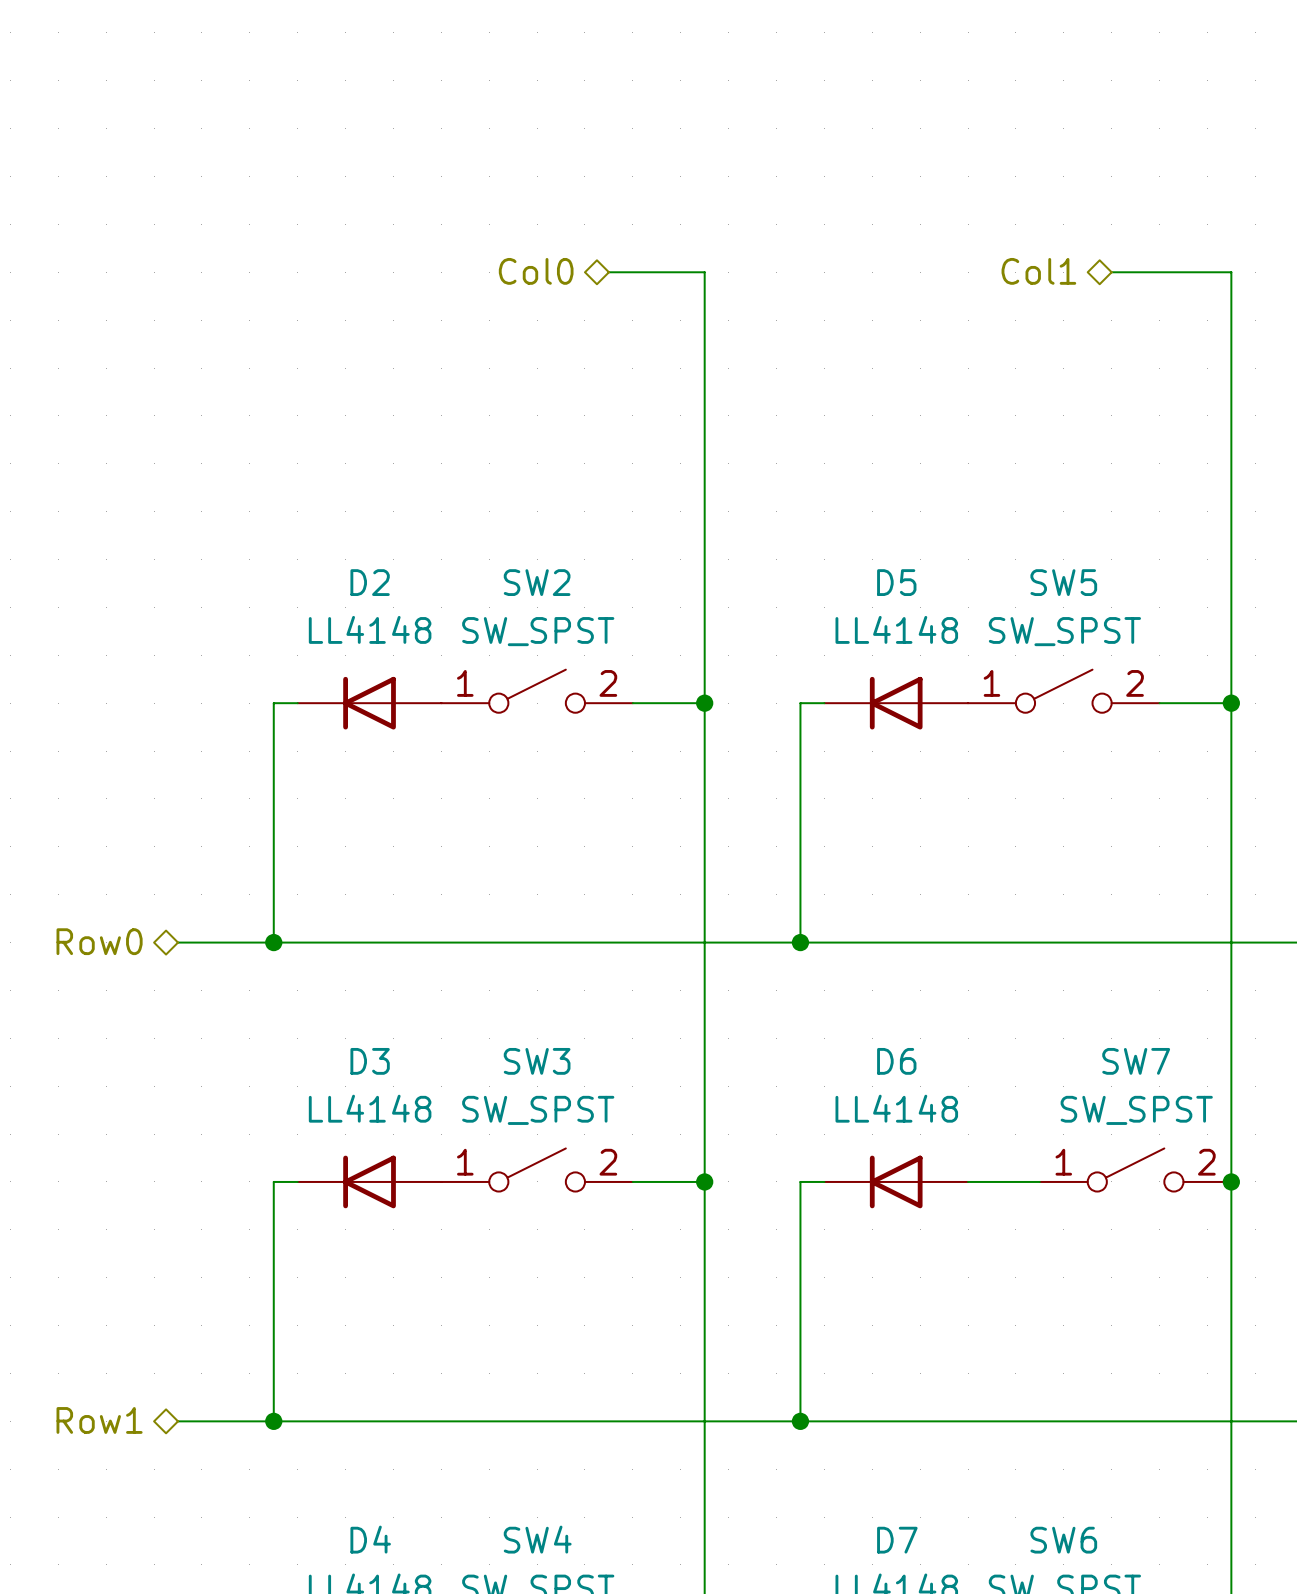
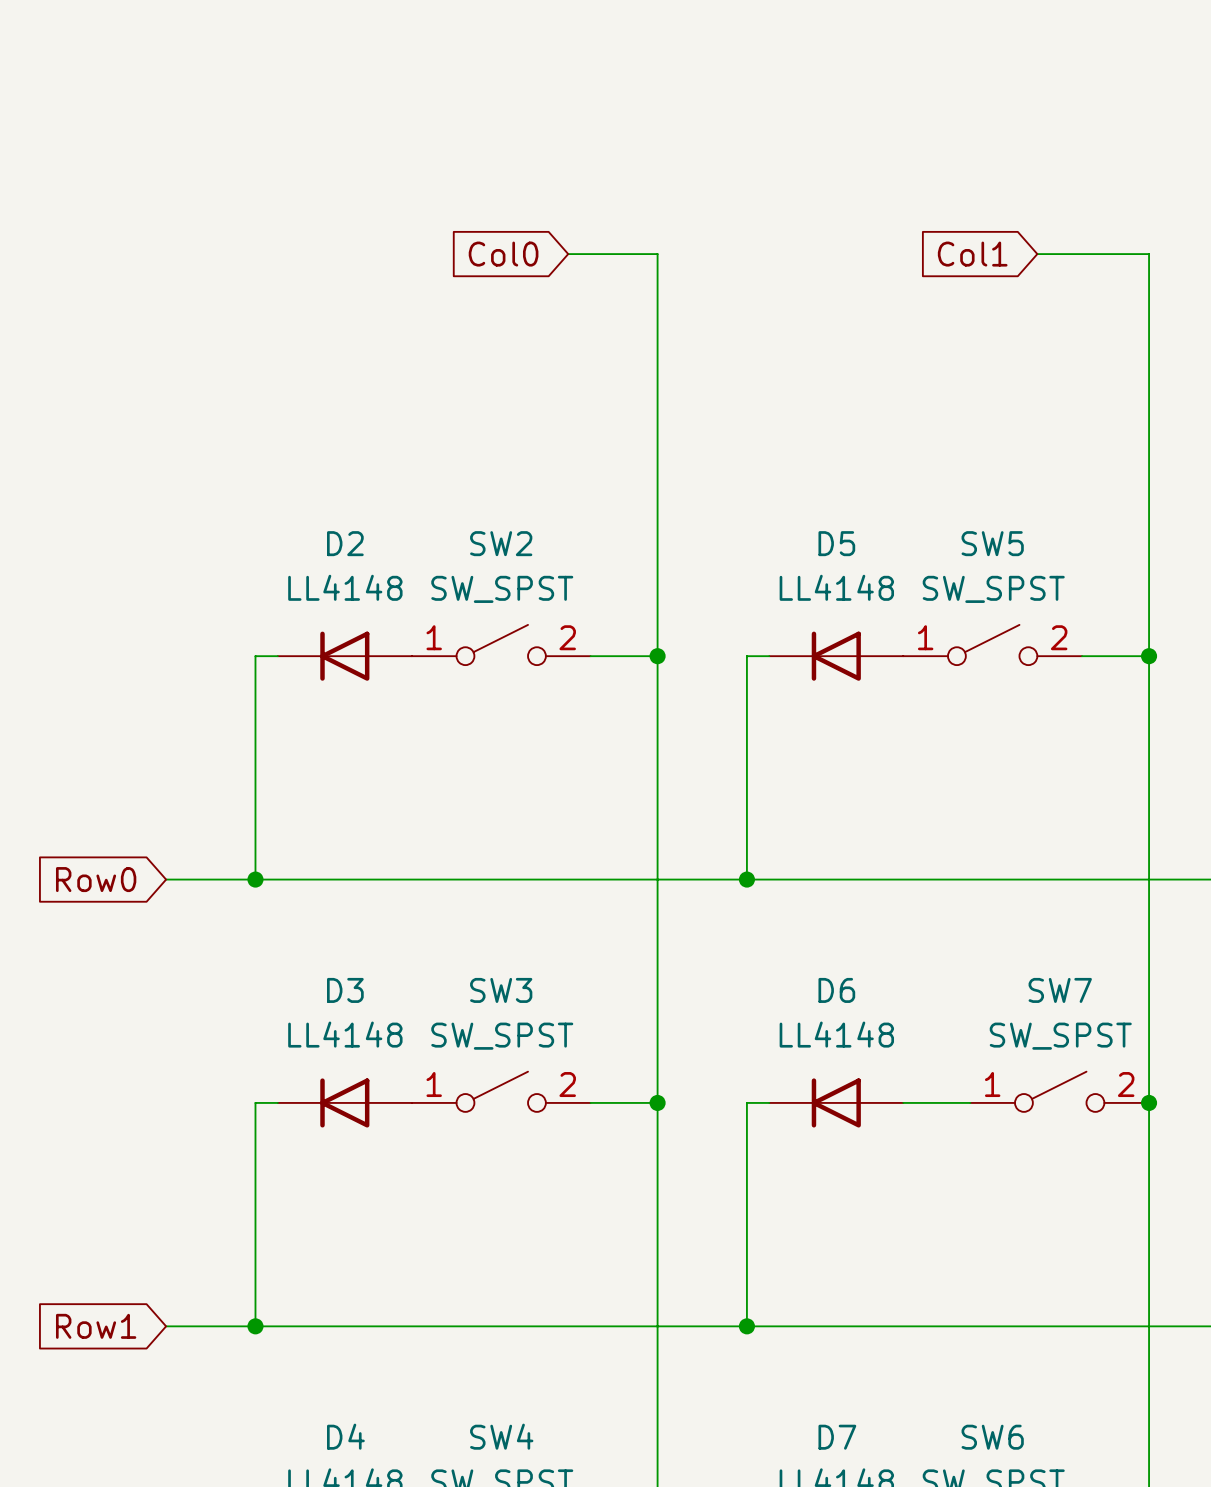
hierarchical label: Col0 (536, 271) -> none
hierarchical label: Col1 (1038, 271) -> none
global label: none -> Col0 (503, 254)
global label: none -> Col1 (972, 254)
hierarchical label: Row0 (99, 941) -> none
global label: none -> Row0 (96, 879)
hierarchical label: Row1 (99, 1420) -> none
global label: none -> Row1 (96, 1326)

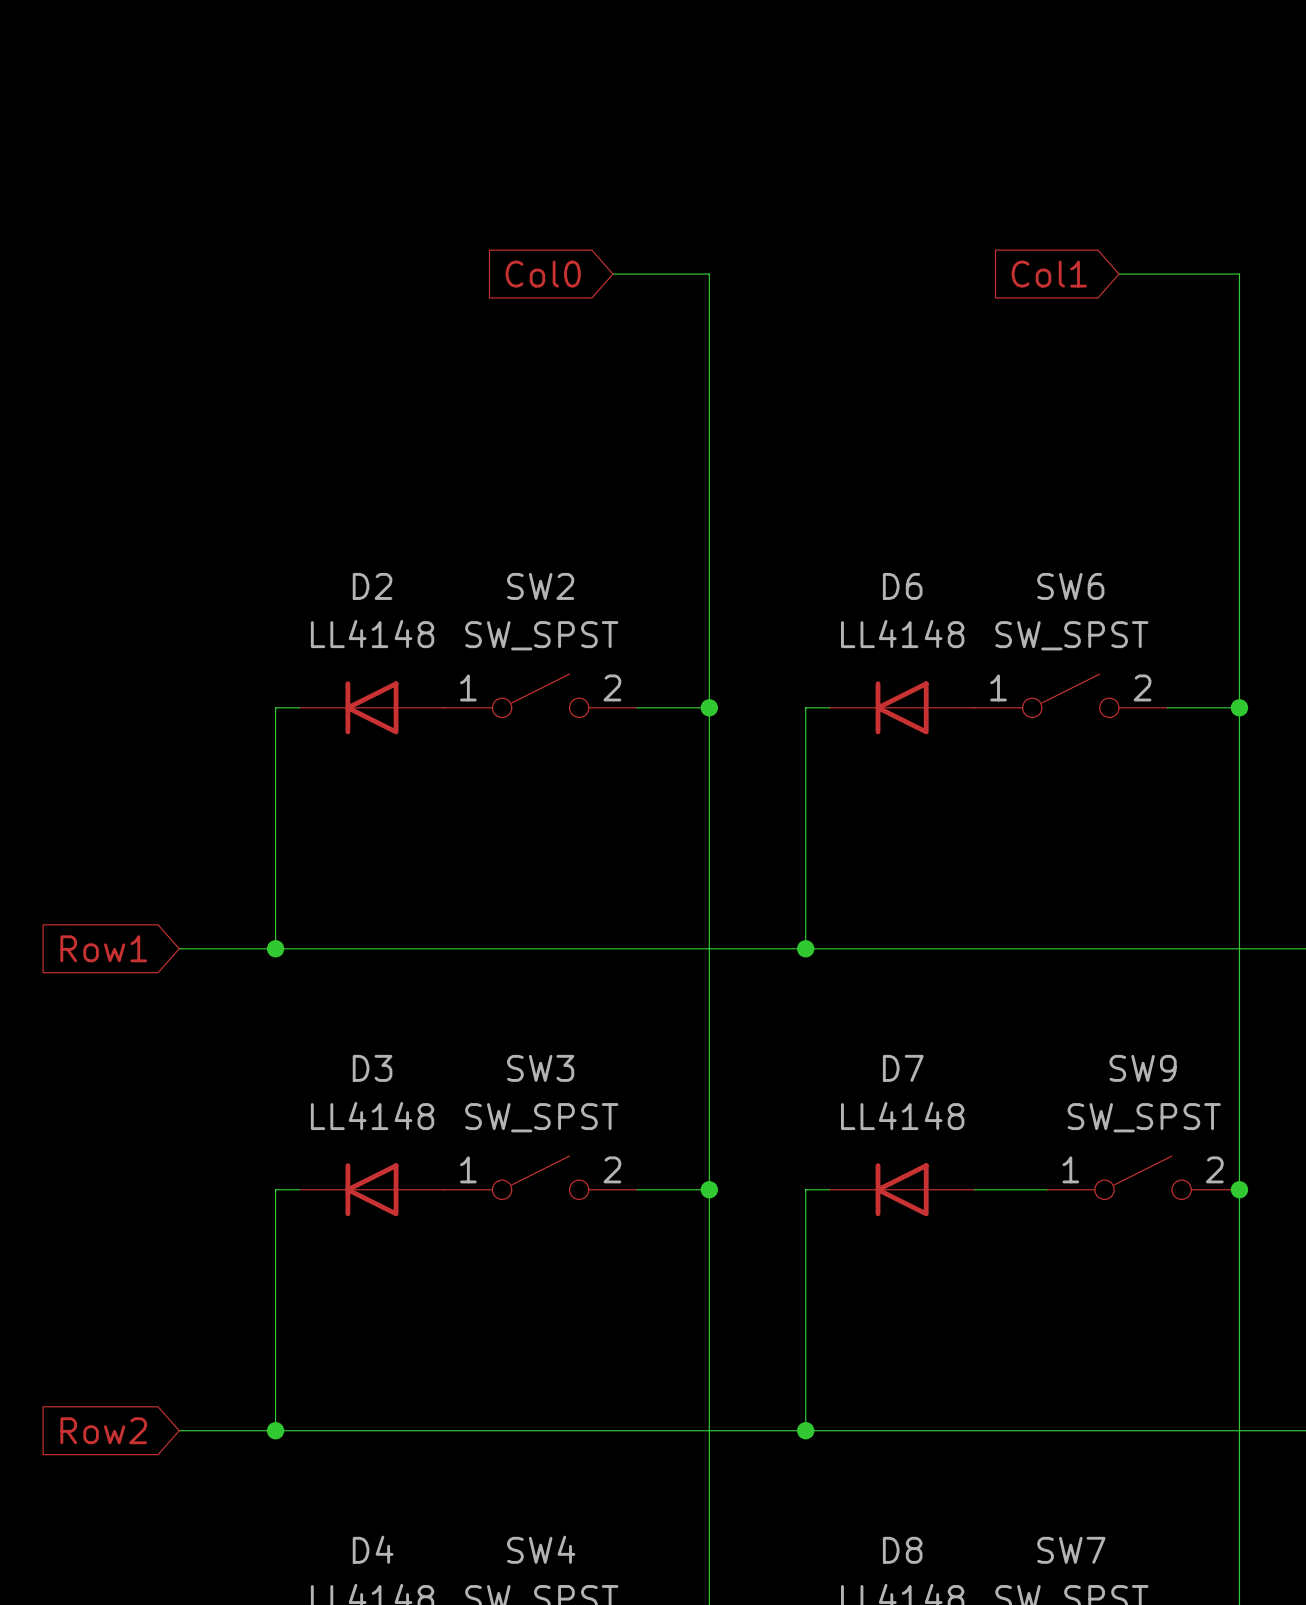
D5 name: D5 (836, 543) -> D6 (902, 586)
SW5 name: SW5 (992, 543) -> SW6 (1070, 586)
global label: Row0 (96, 879) -> Row1 (103, 948)
D6 name: D6 (836, 990) -> D7 (903, 1068)
SW7 name: SW7 (1060, 990) -> SW9 (1143, 1068)
global label: Row1 (96, 1326) -> Row2 (103, 1430)
D7 name: D7 (837, 1437) -> D8 (902, 1550)
SW6 name: SW6 (992, 1437) -> SW7 (1071, 1550)

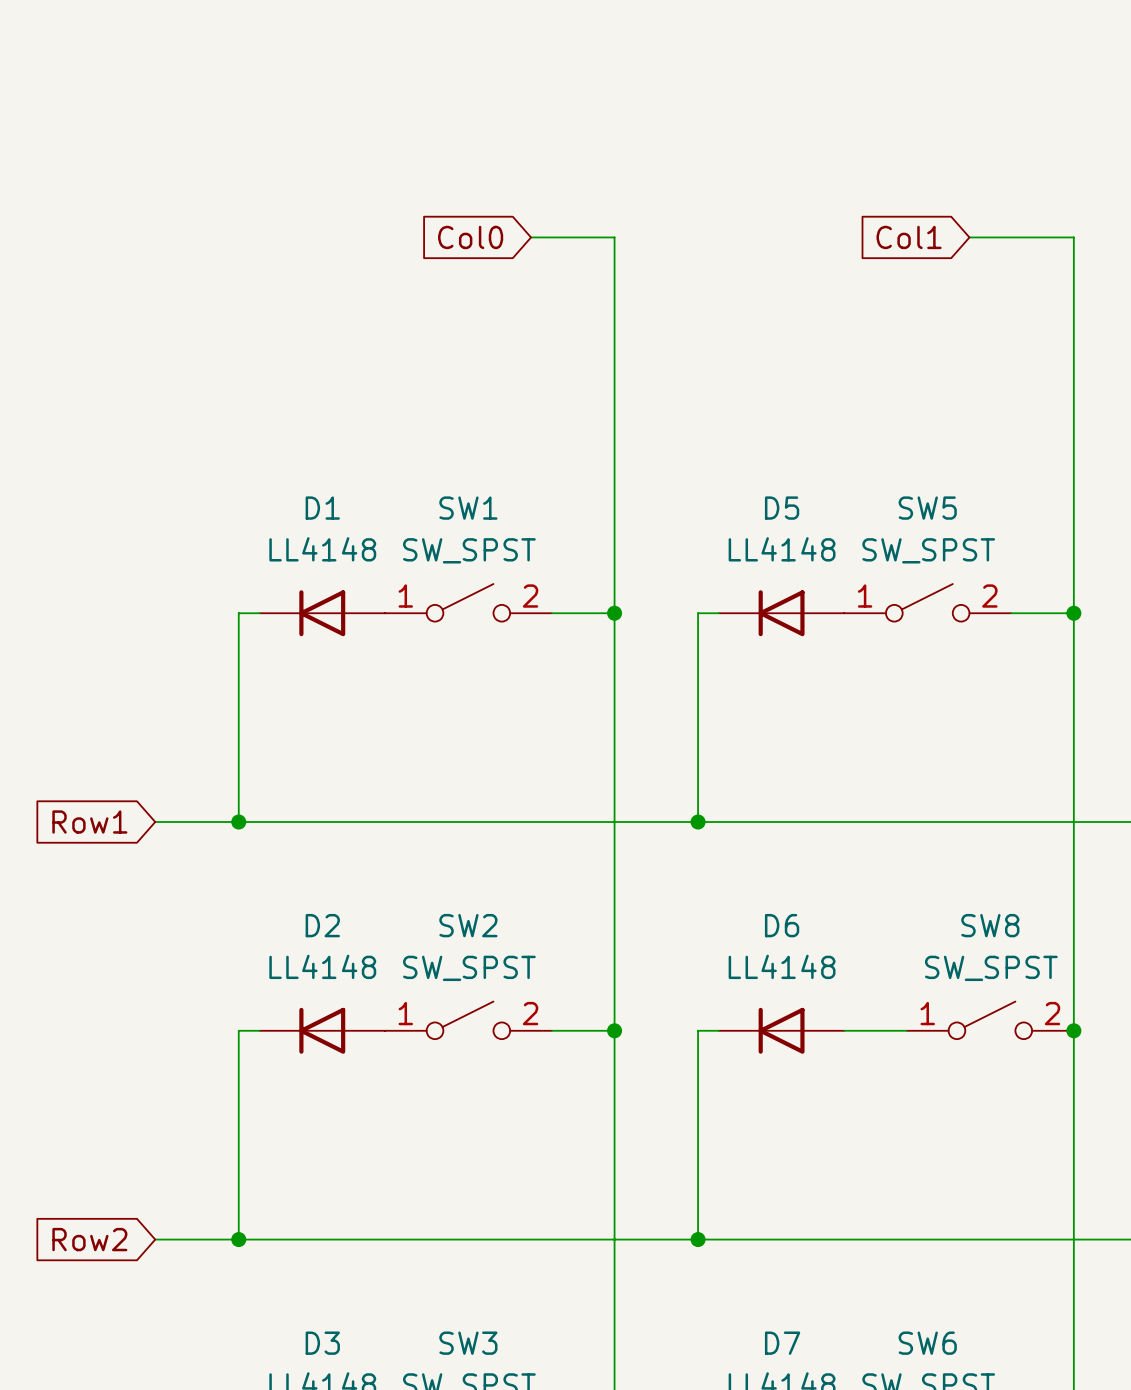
D2 name: D2 (372, 586) -> D1 (322, 508)
SW2 name: SW2 (540, 586) -> SW1 (468, 508)
D6 name: D6 (902, 586) -> D5 (782, 508)
SW6 name: SW6 (1070, 586) -> SW5 (927, 508)
D3 name: D3 (372, 1068) -> D2 (322, 925)
SW3 name: SW3 (540, 1068) -> SW2 (468, 925)
D7 name: D7 (903, 1068) -> D6 (782, 925)
SW9 name: SW9 (1143, 1068) -> SW8 (990, 925)
D4 name: D4 (373, 1549) -> D3 (322, 1343)
SW4 name: SW4 (541, 1549) -> SW3 (468, 1343)
D8 name: D8 (902, 1550) -> D7 (782, 1343)
SW7 name: SW7 (1071, 1550) -> SW6 (927, 1343)

